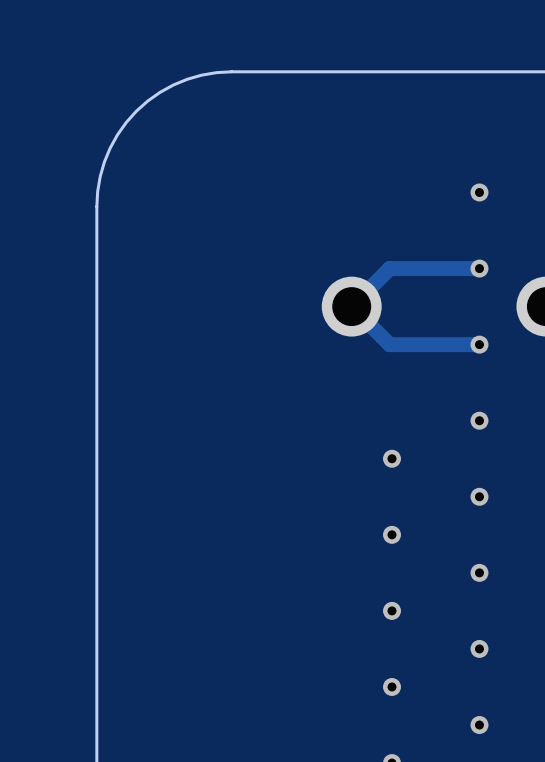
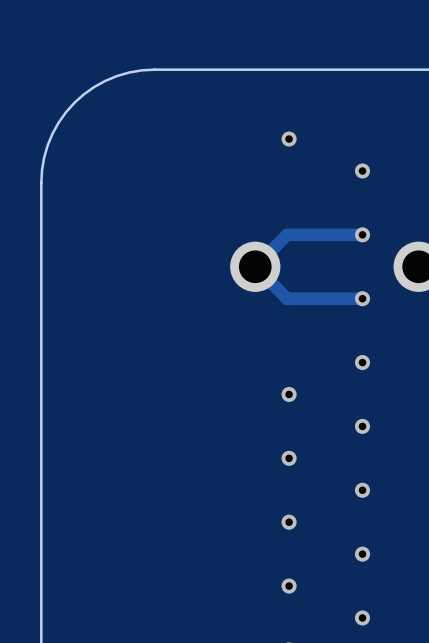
via: none -> (289, 139)

